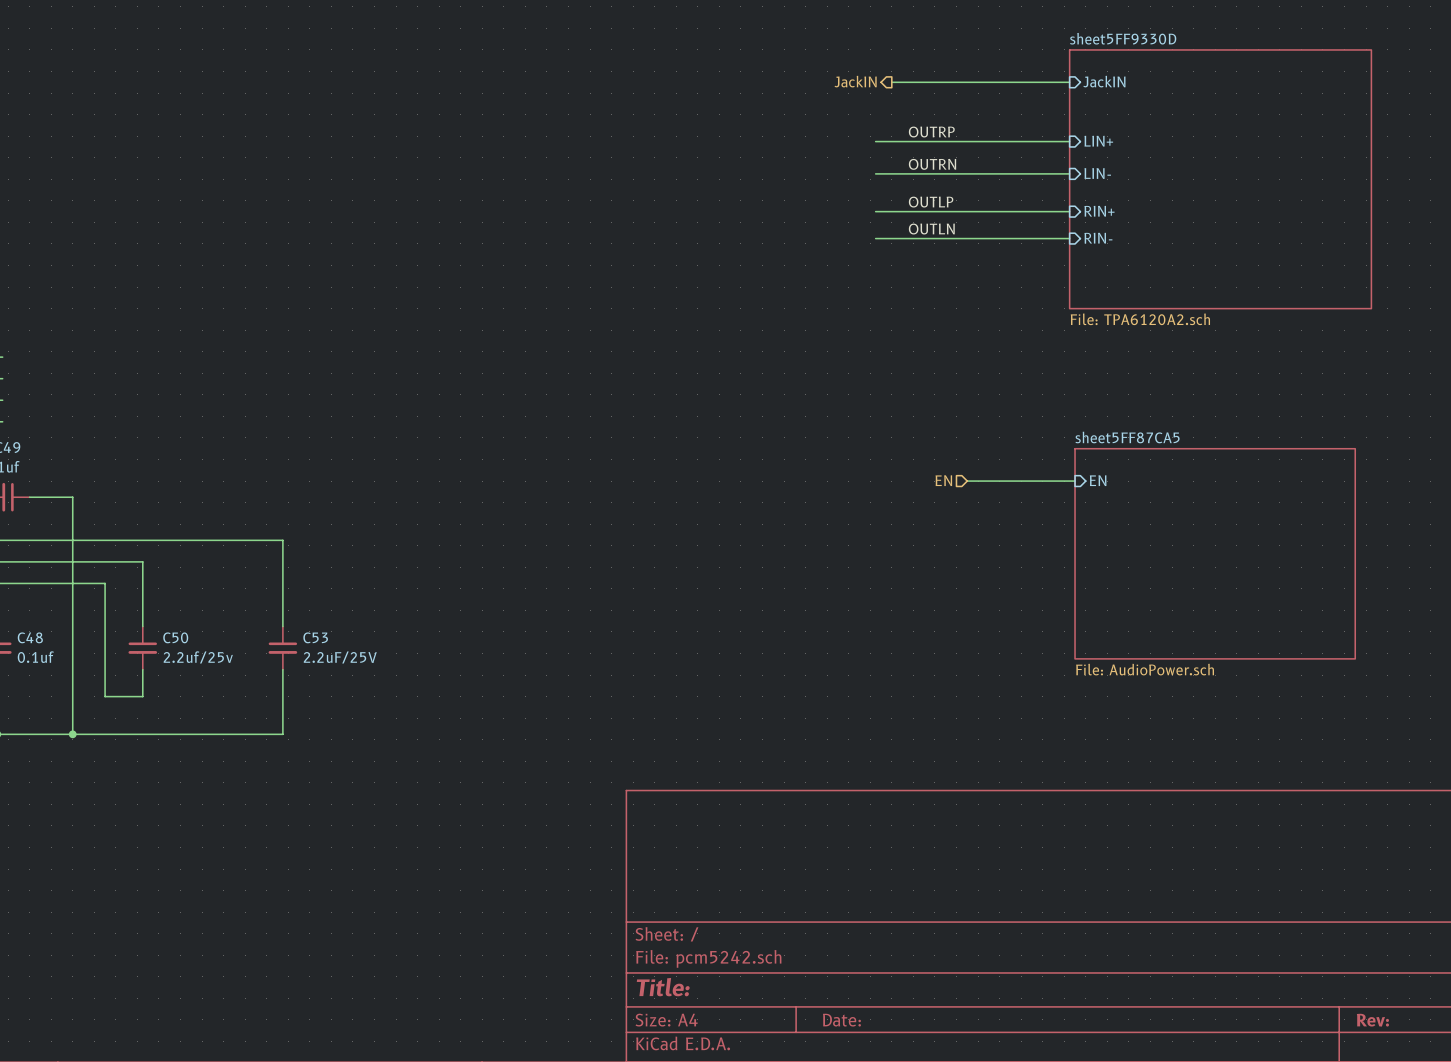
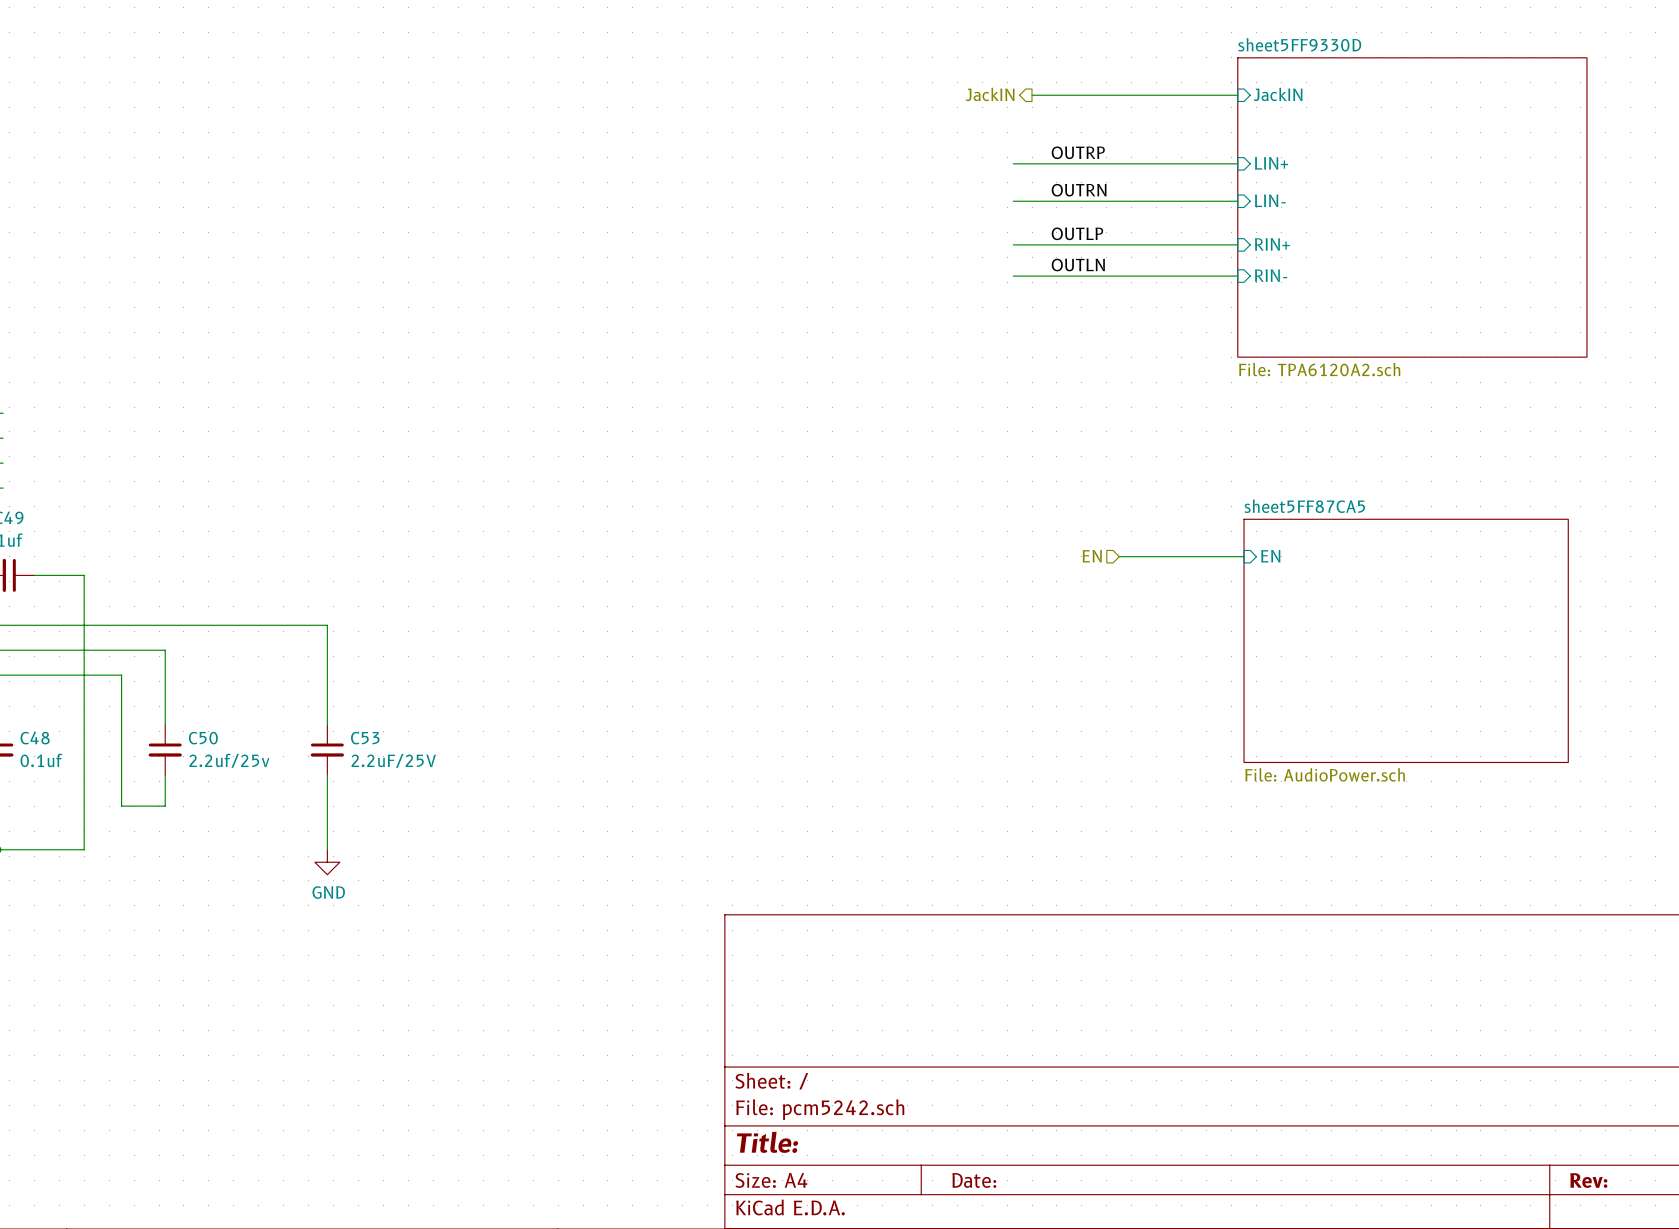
wire: (72, 734) (282, 734) -> none
junction: (72, 734) -> none
power symbol: none -> GND (327, 862)

